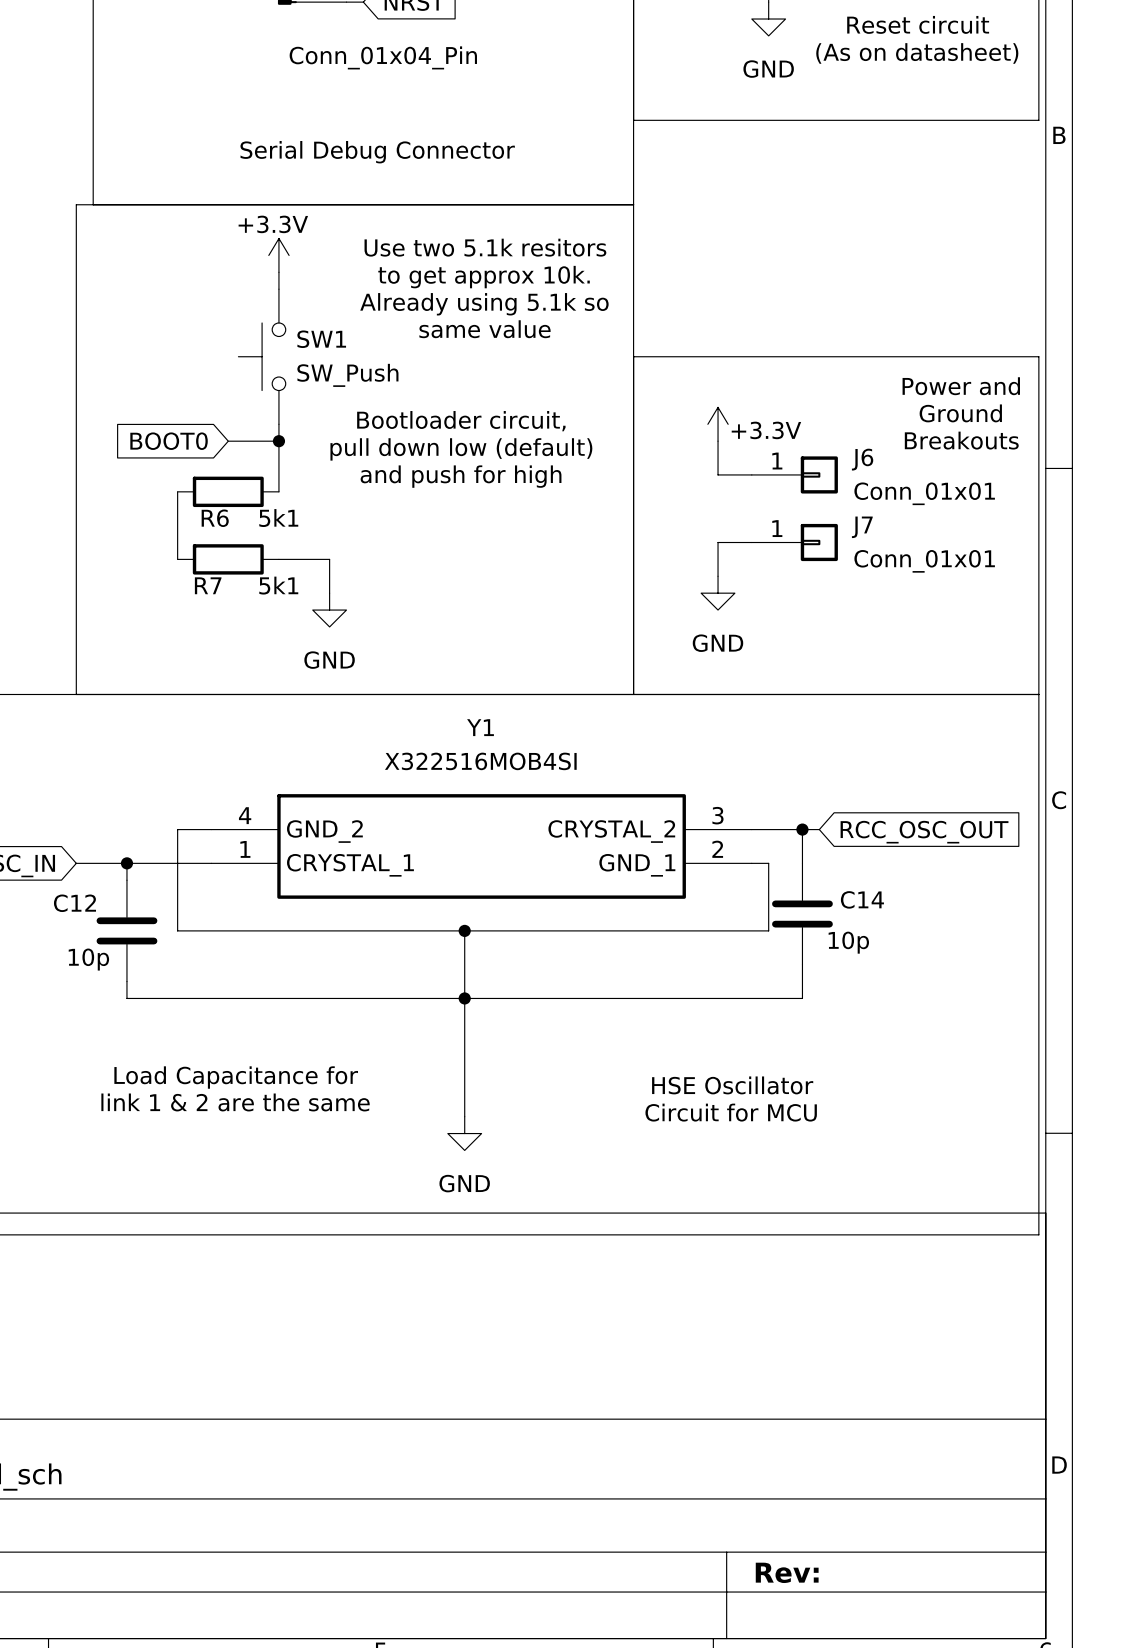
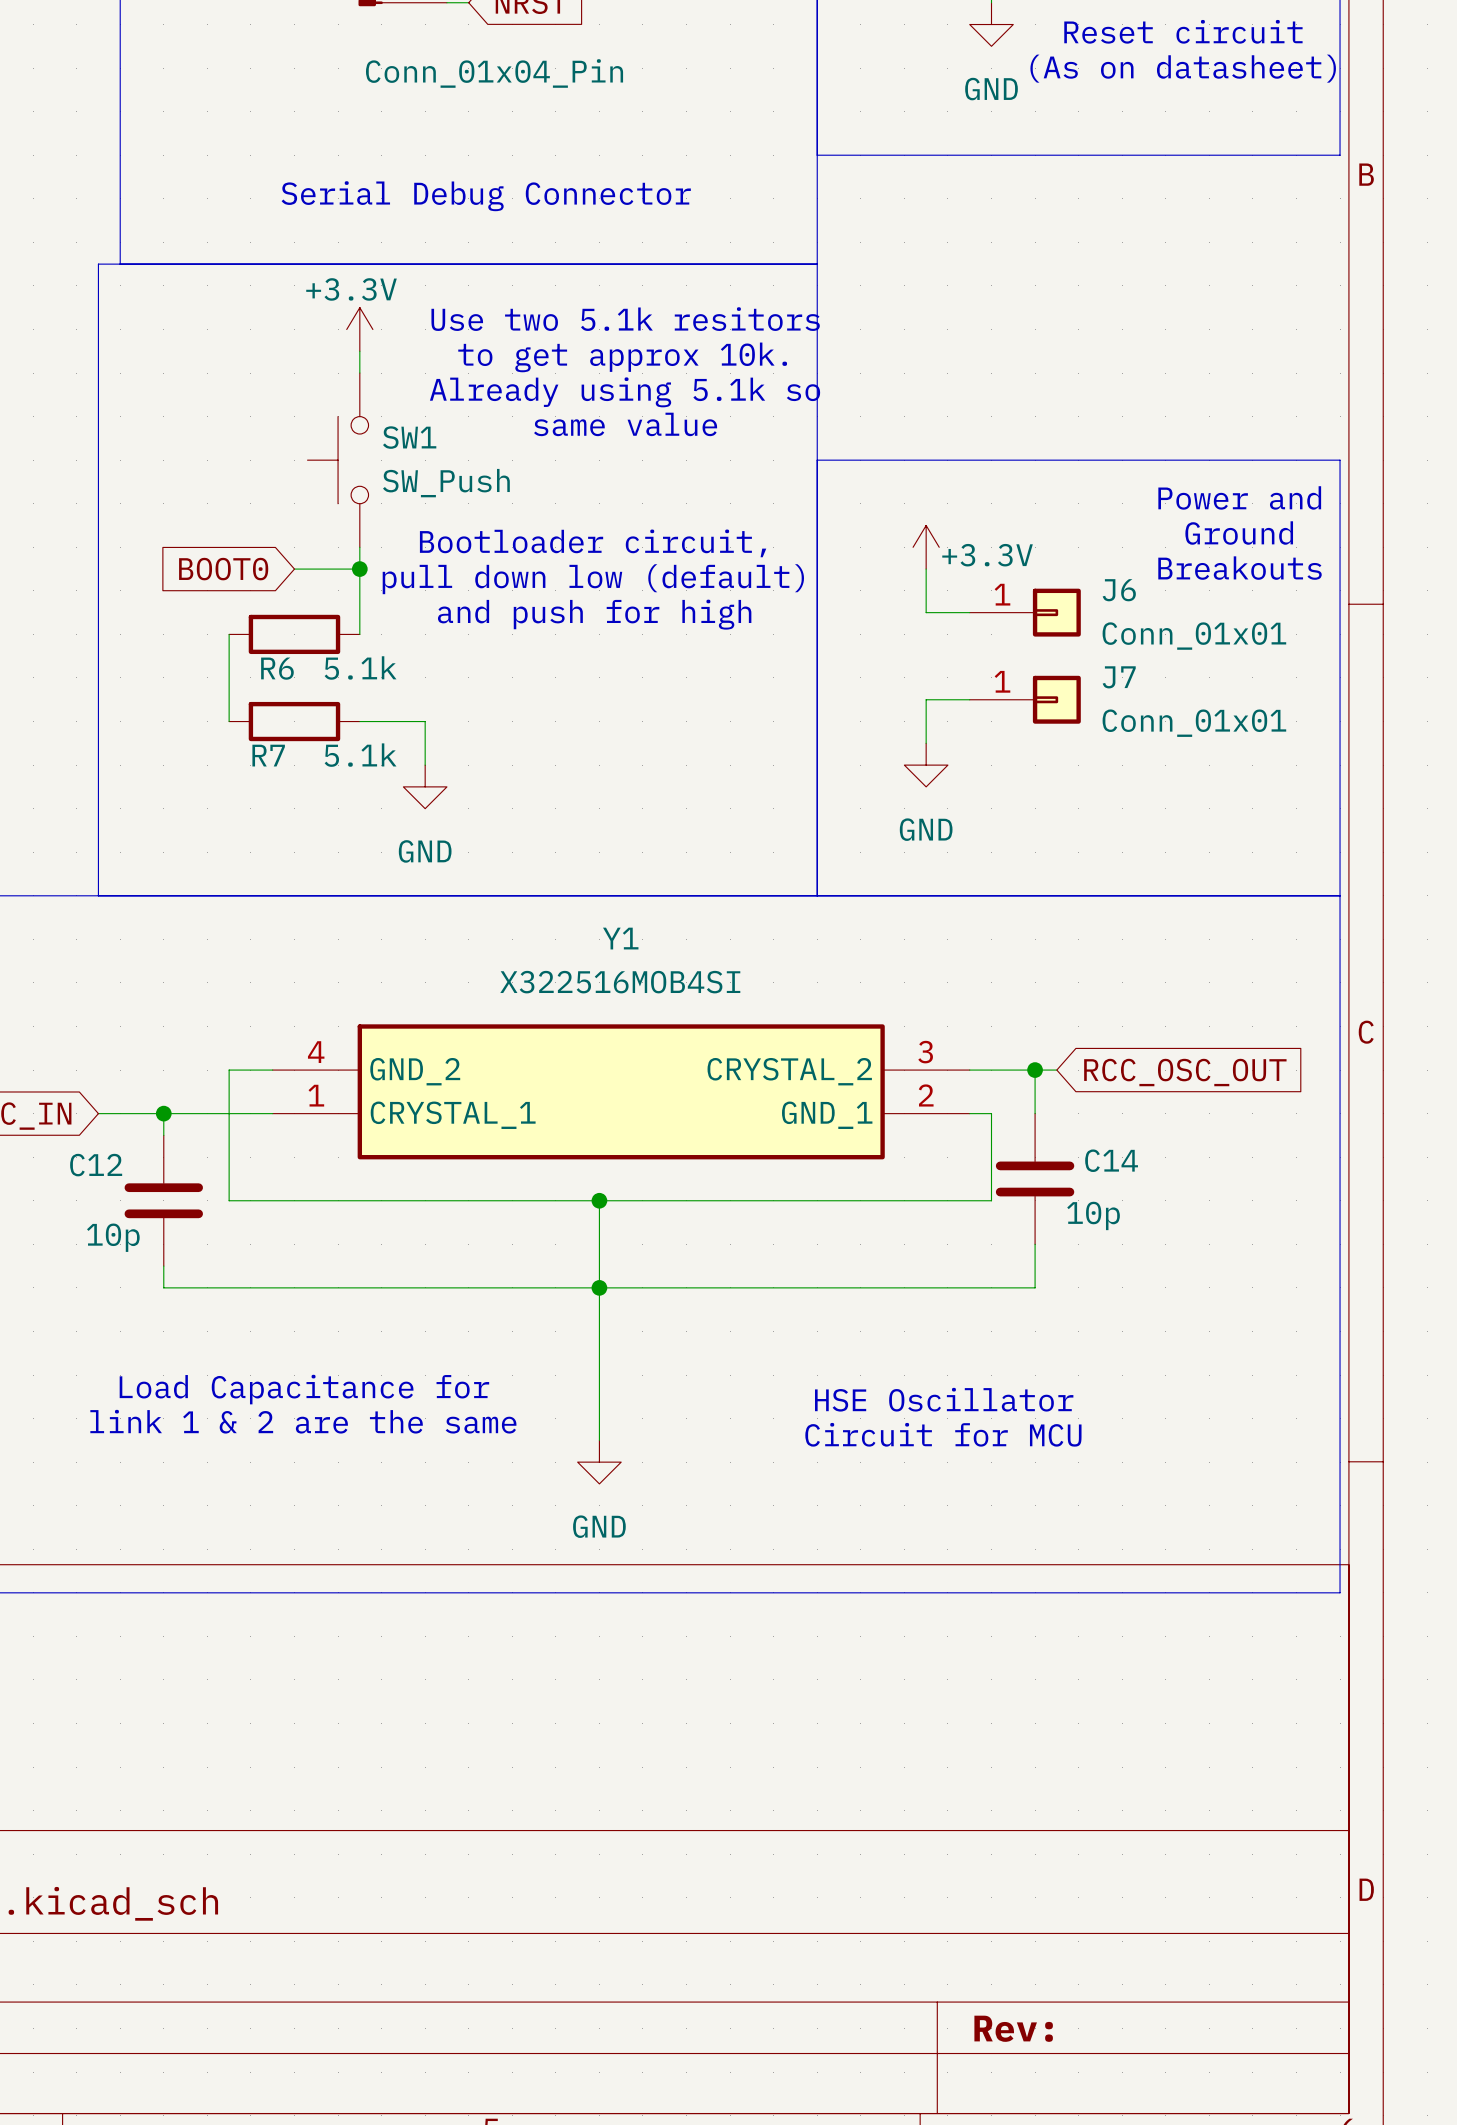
R6 value: 5k1 (278, 518) -> 5.1k (360, 667)
R7 value: 5k1 (278, 585) -> 5.1k (360, 755)

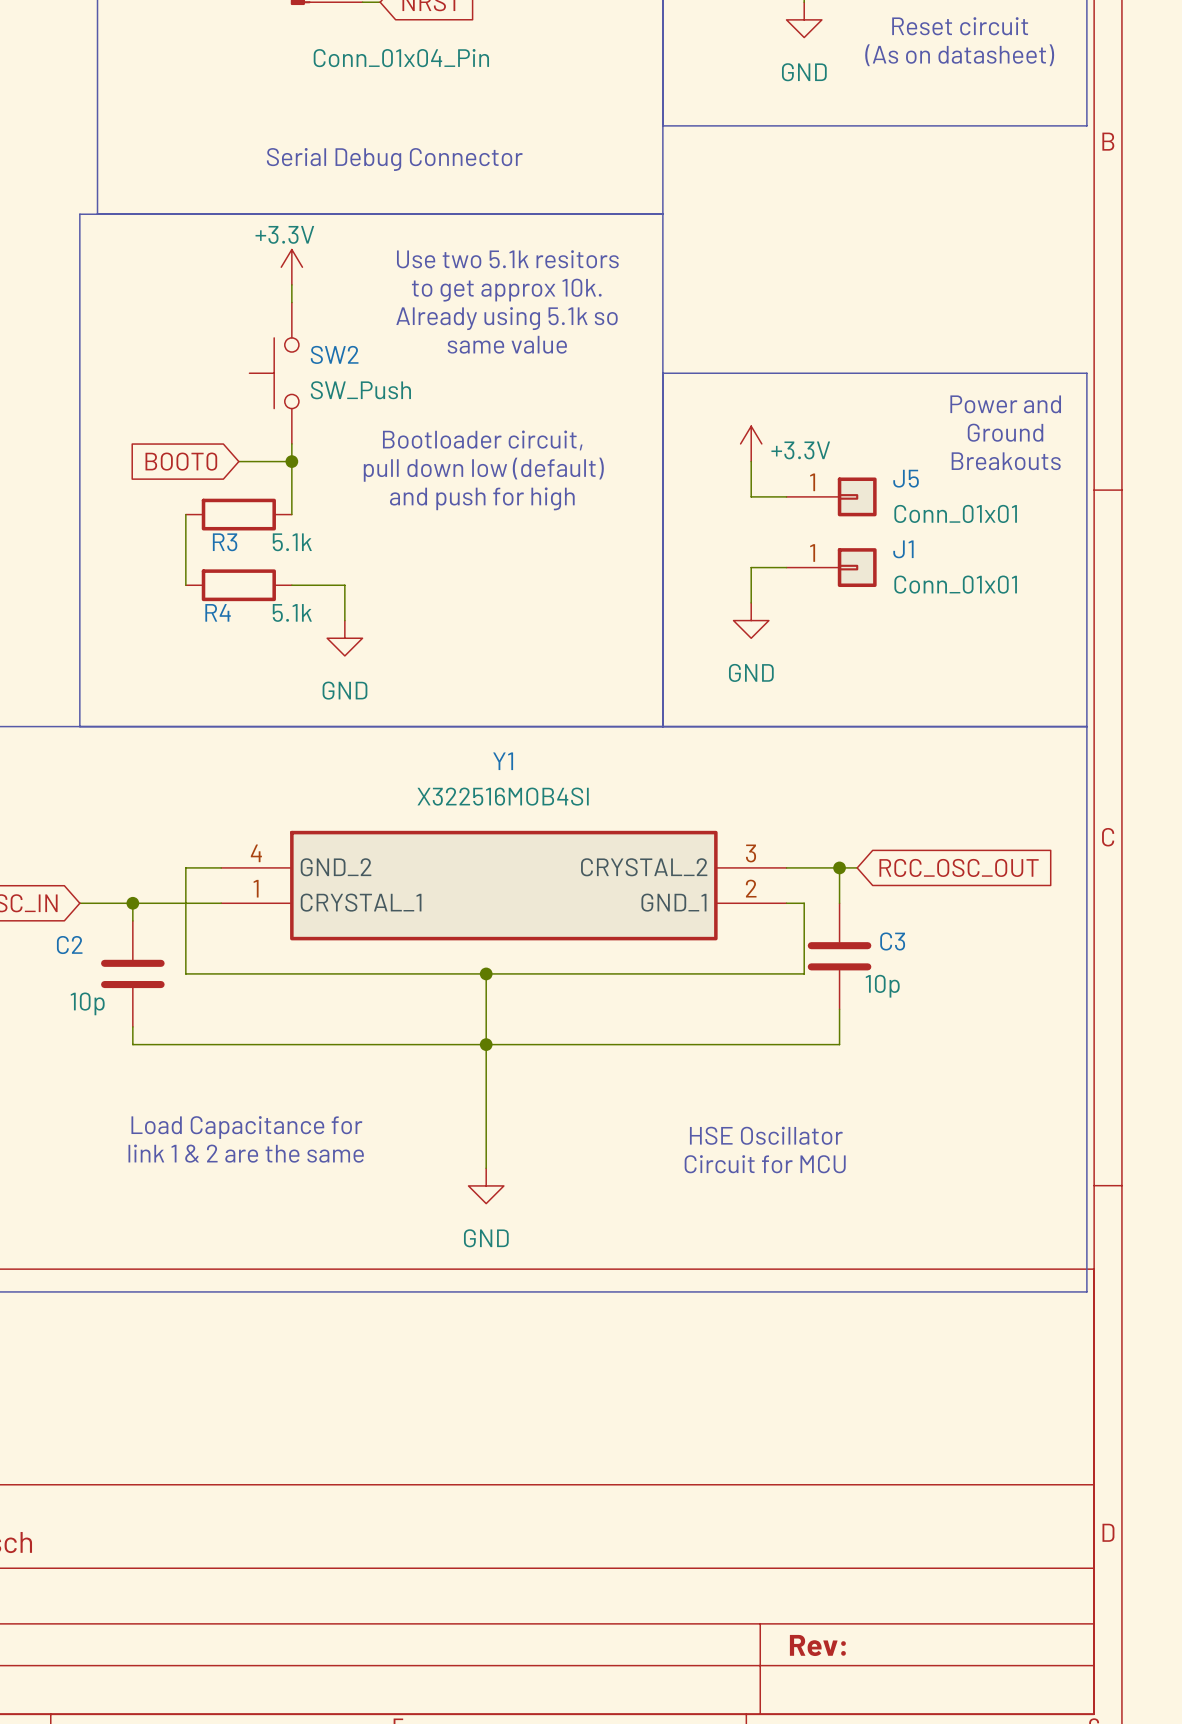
SW1 name: SW1 (409, 437) -> SW2 (334, 354)
J6 name: J6 (1119, 590) -> J5 (906, 478)
R6 name: R6 (277, 668) -> R3 (225, 542)
J7 name: J7 (1119, 677) -> J1 (903, 549)
R7 name: R7 (268, 755) -> R4 (218, 612)
C14 name: C14 (1111, 1160) -> C3 (892, 941)
C12 name: C12 (96, 1165) -> C2 (69, 945)

